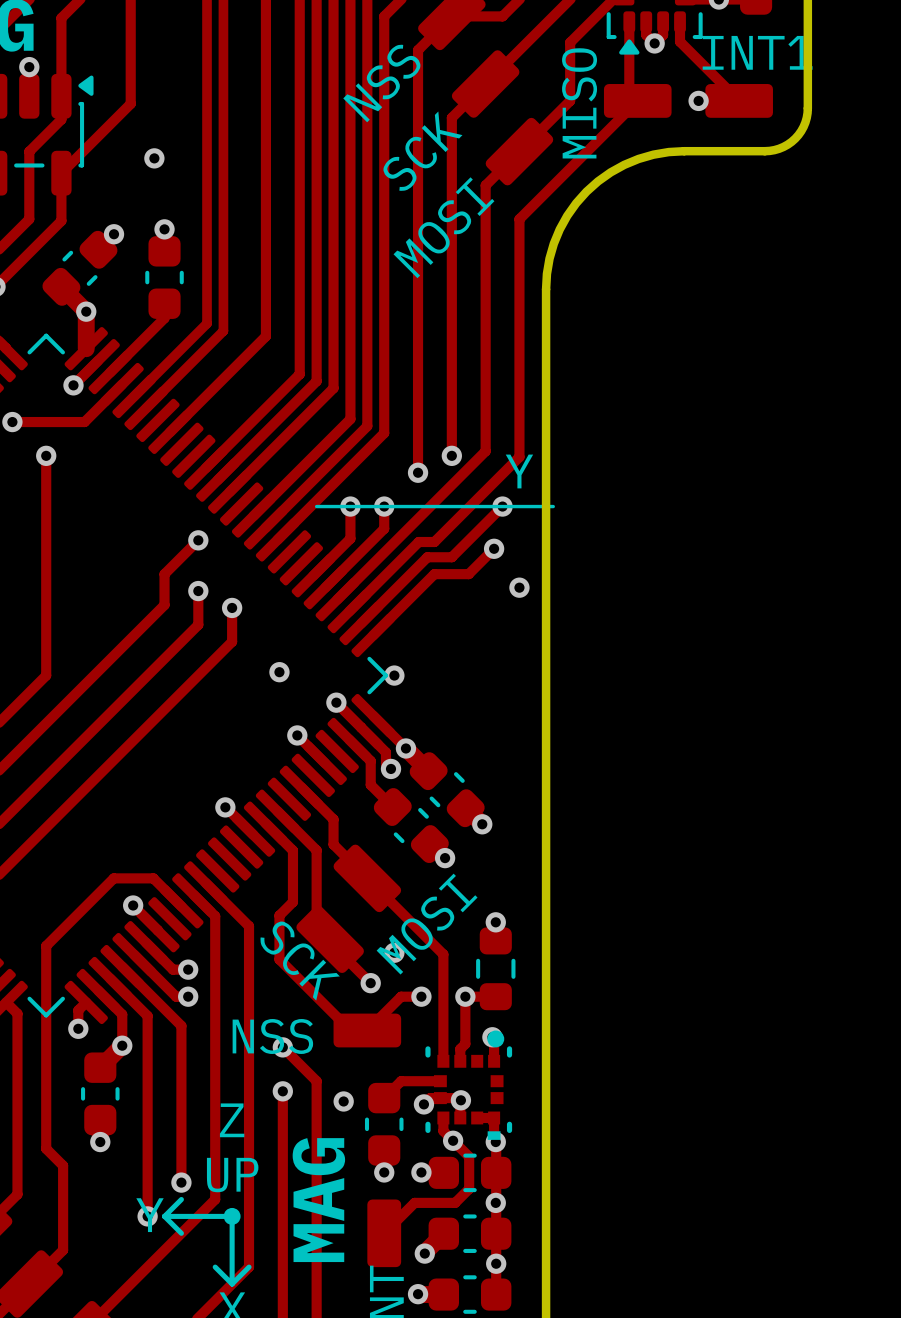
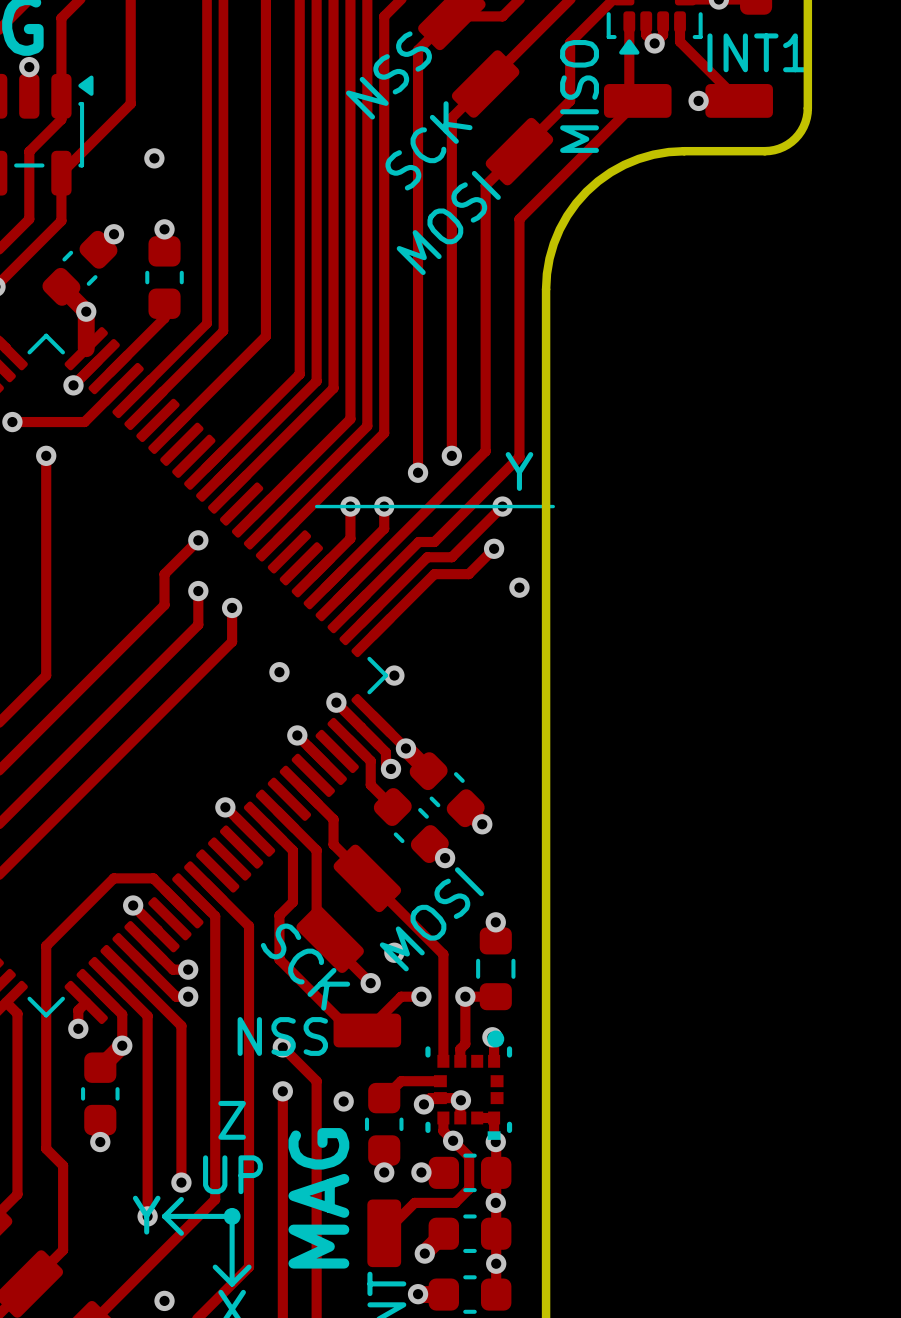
via: none -> (164, 1300)

